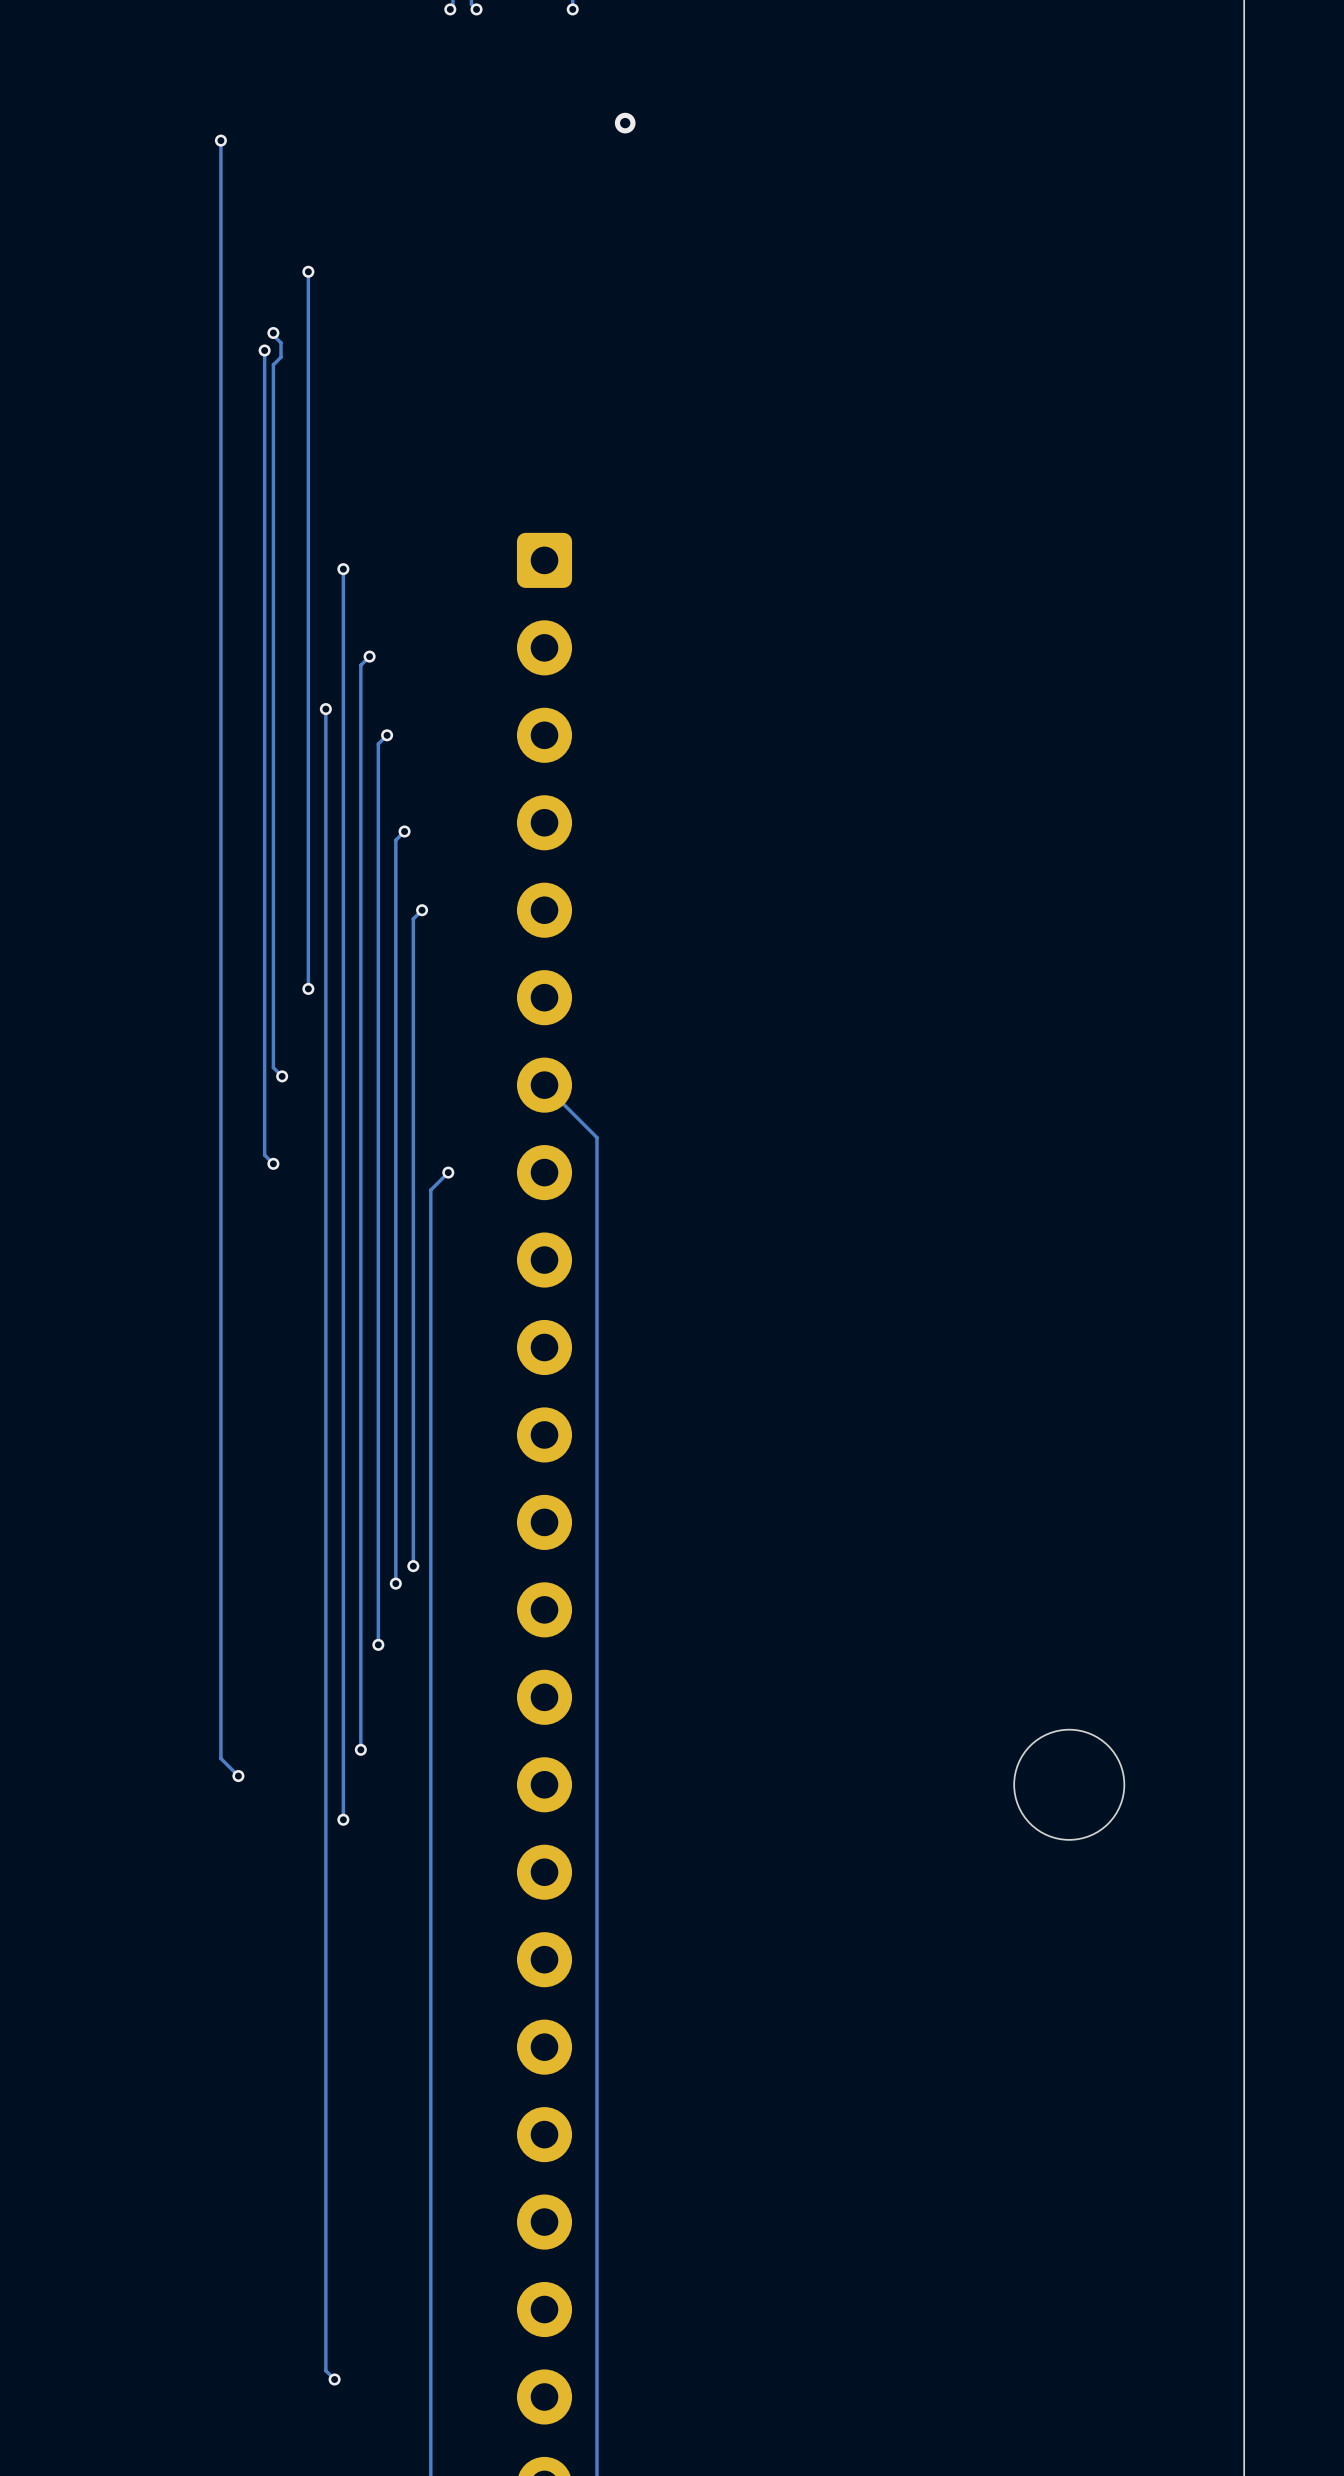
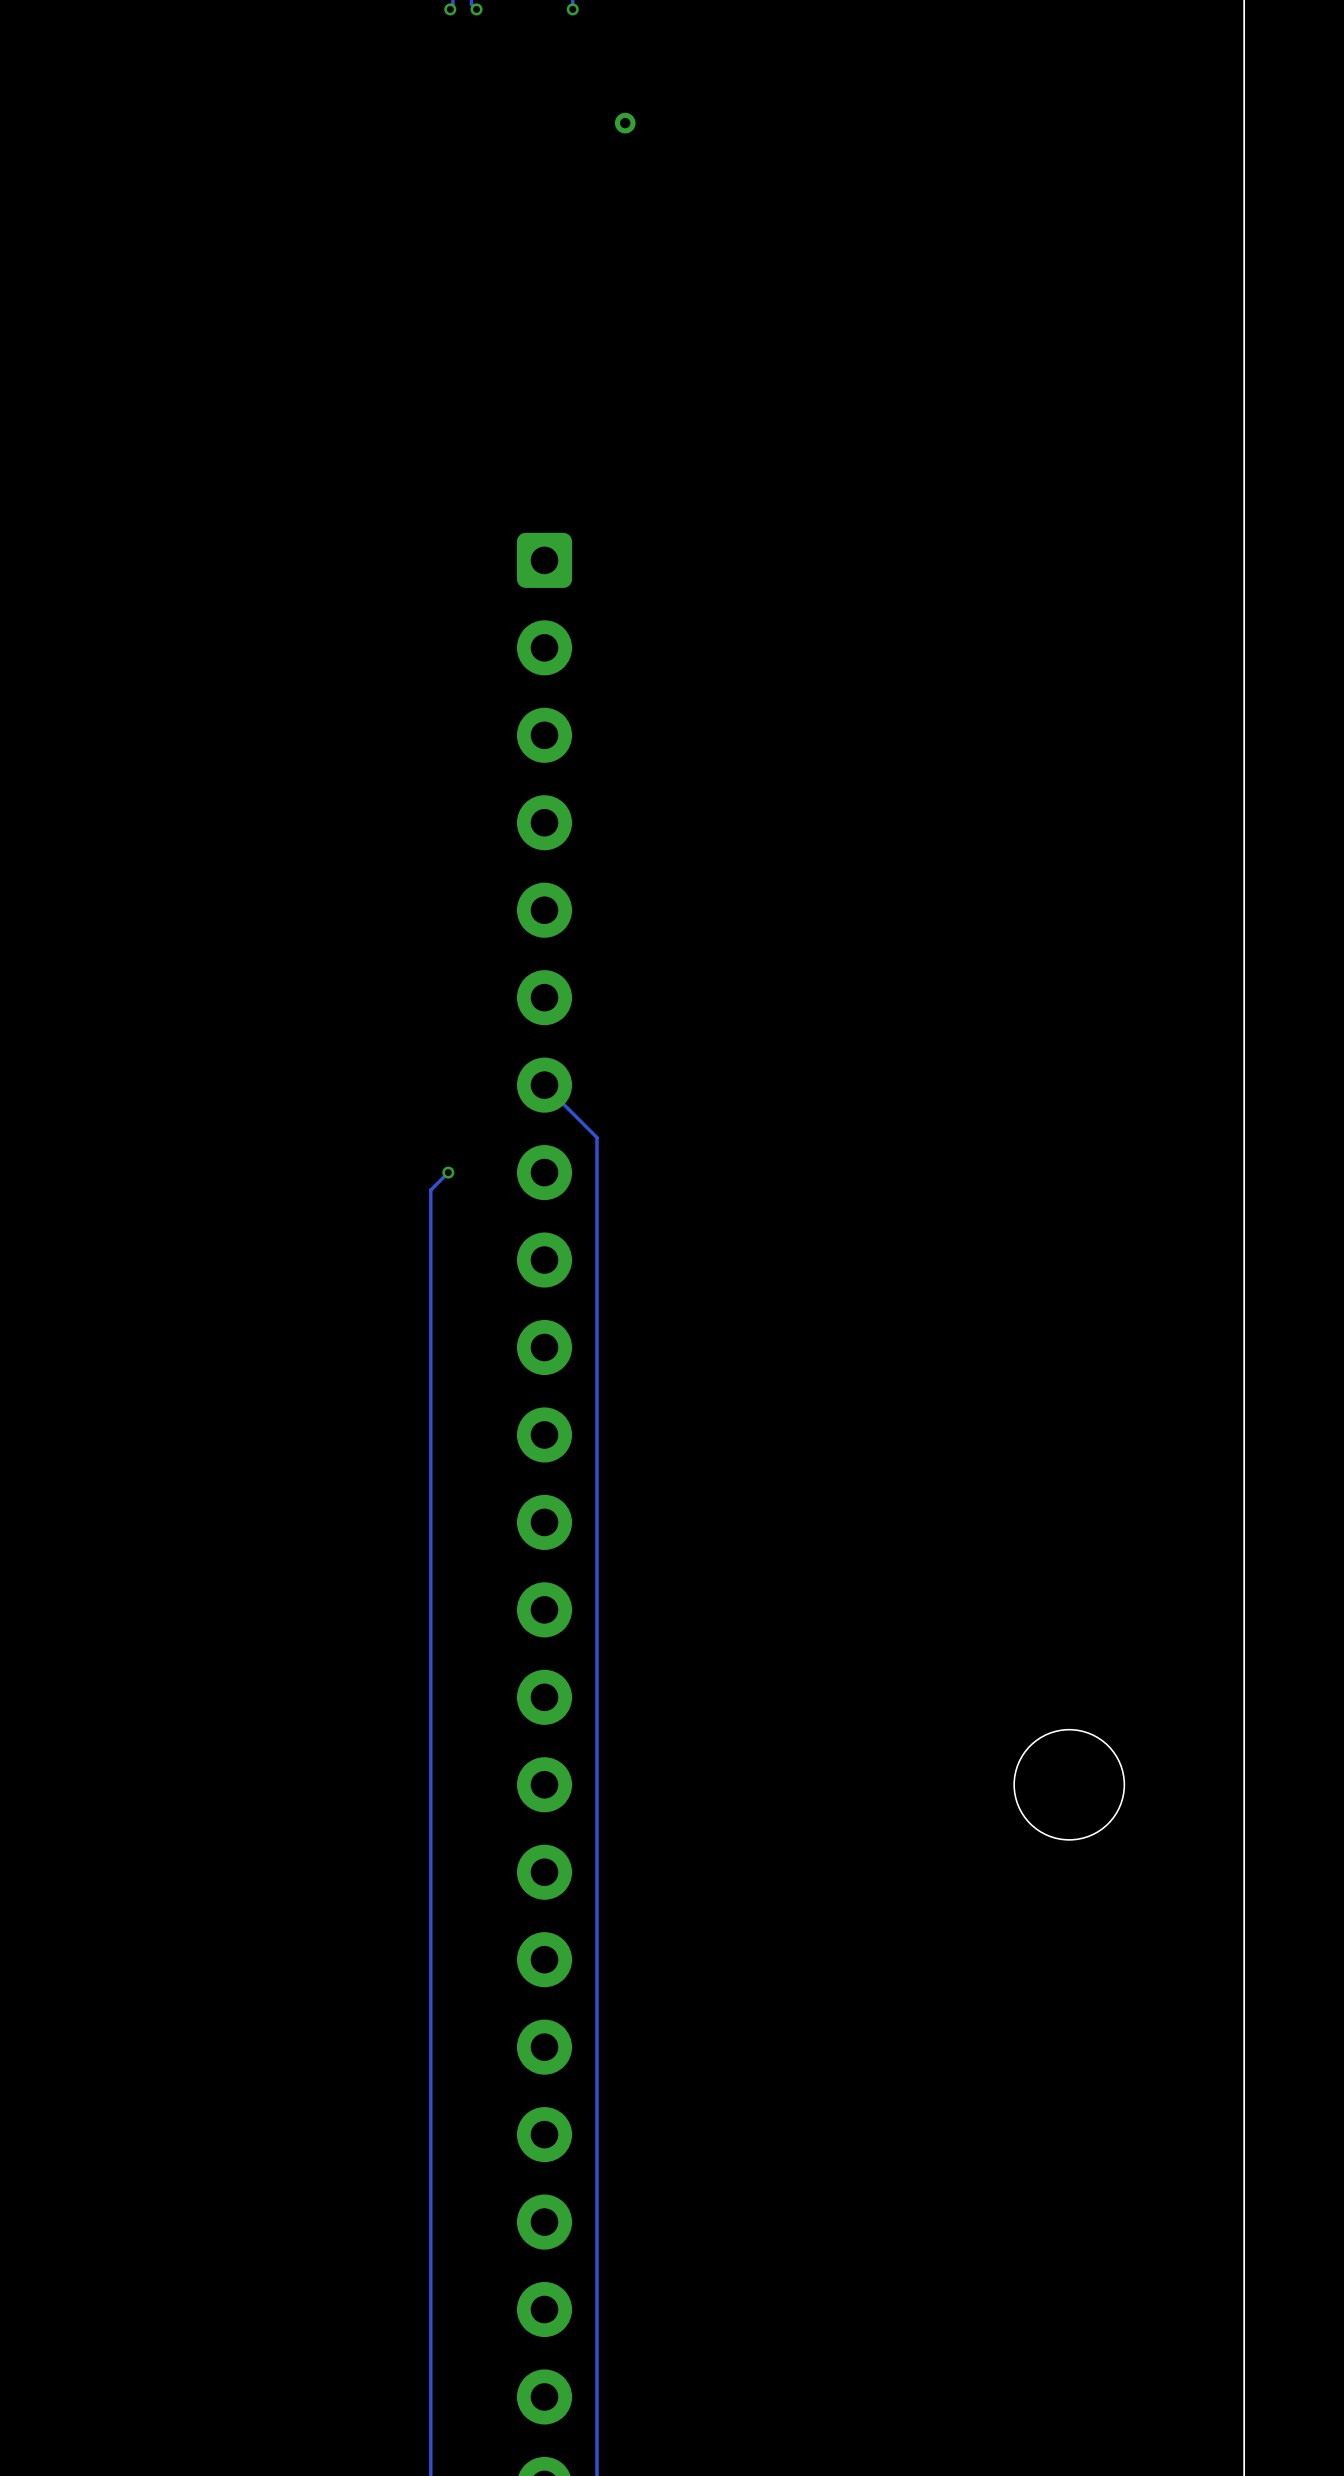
track: (220, 140) (220, 1758) (238, 1776) -> none
via: (220, 140) -> none
track: (308, 271) (308, 988) -> none
via: (308, 271) -> none
track: (273, 333) (281, 342) (281, 357) (273, 364) (273, 1067) (282, 1076) -> none
via: (273, 333) -> none
track: (264, 350) (264, 1155) (273, 1163) -> none
via: (264, 350) -> none
track: (343, 569) (343, 1819) -> none
via: (343, 569) -> none
track: (369, 656) (360, 665) (360, 1749) -> none
via: (369, 656) -> none
track: (325, 709) (325, 2370) (334, 2379) -> none
via: (325, 709) -> none
track: (387, 735) (378, 744) (378, 1644) -> none
via: (387, 735) -> none
track: (404, 831) (395, 840) (395, 1583) -> none
via: (404, 831) -> none
track: (422, 910) (413, 918) (413, 1566) -> none
via: (422, 910) -> none
via: (308, 988) -> none
via: (282, 1076) -> none
via: (273, 1163) -> none
via: (413, 1566) -> none
via: (395, 1583) -> none
via: (378, 1644) -> none
via: (360, 1749) -> none
via: (238, 1776) -> none
via: (343, 1819) -> none
via: (334, 2379) -> none

